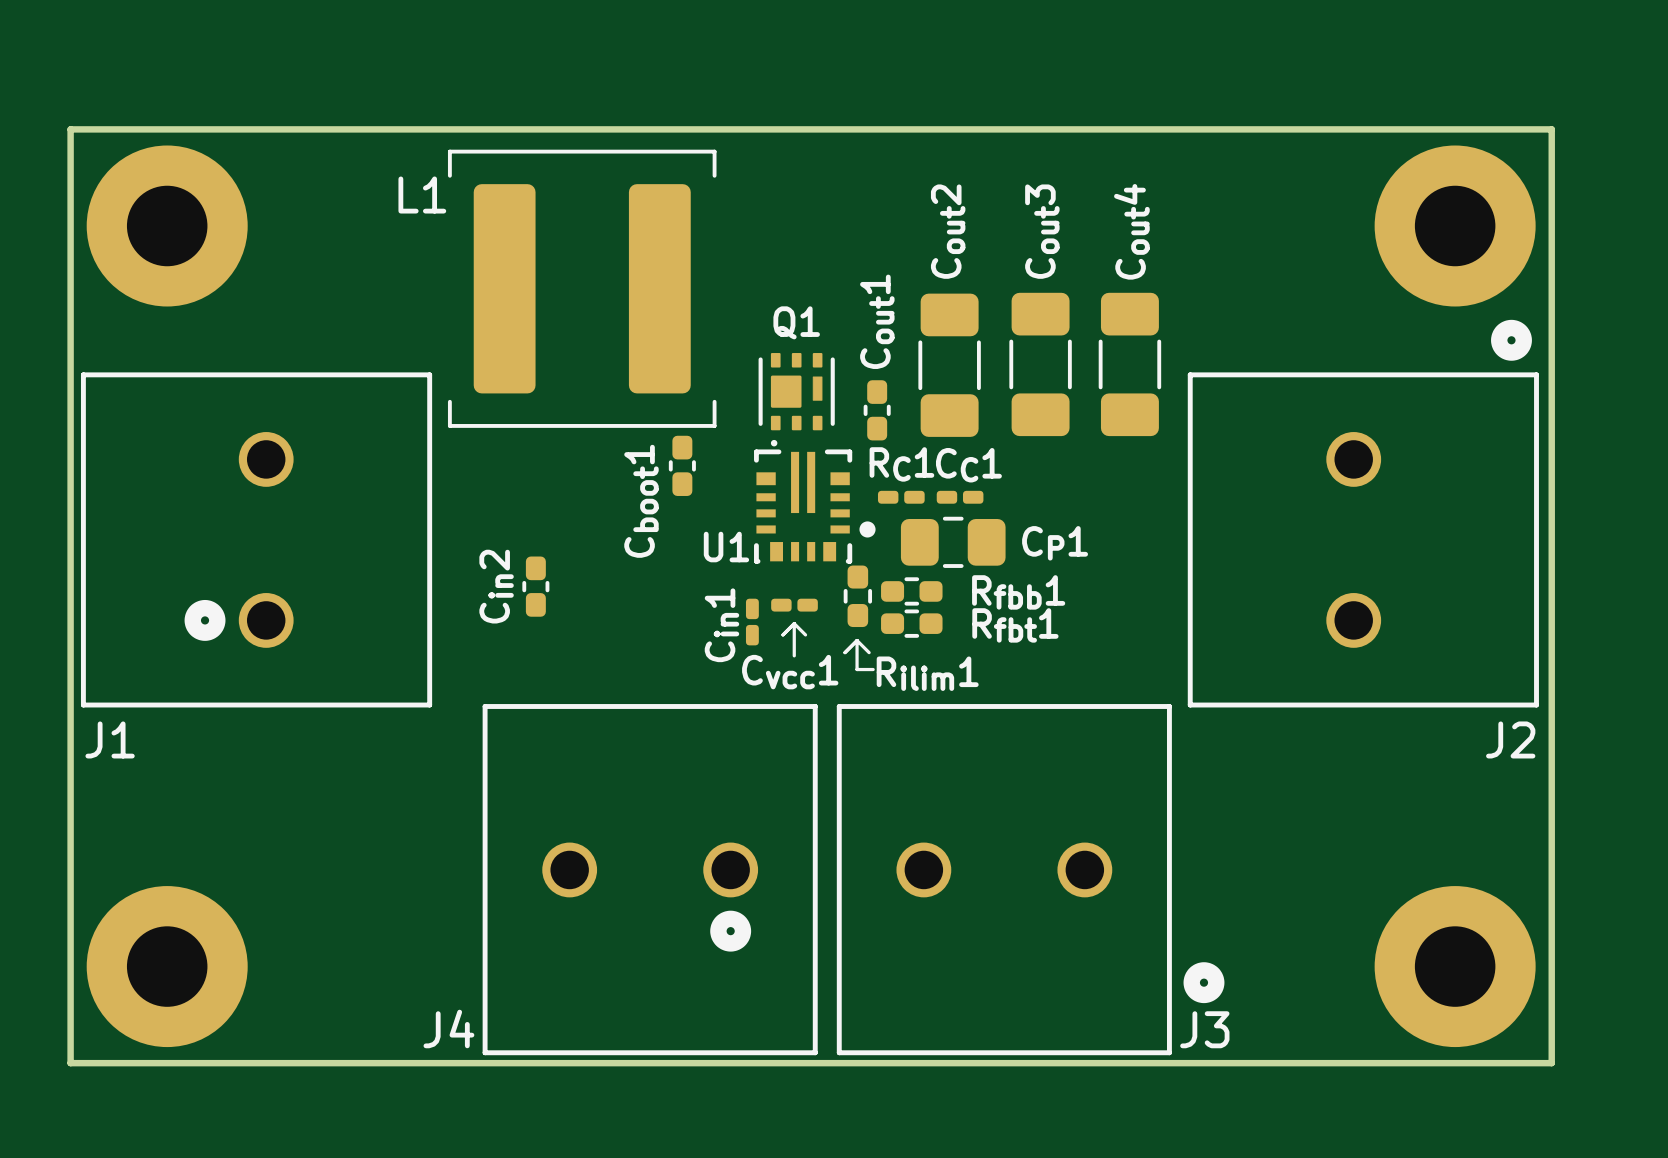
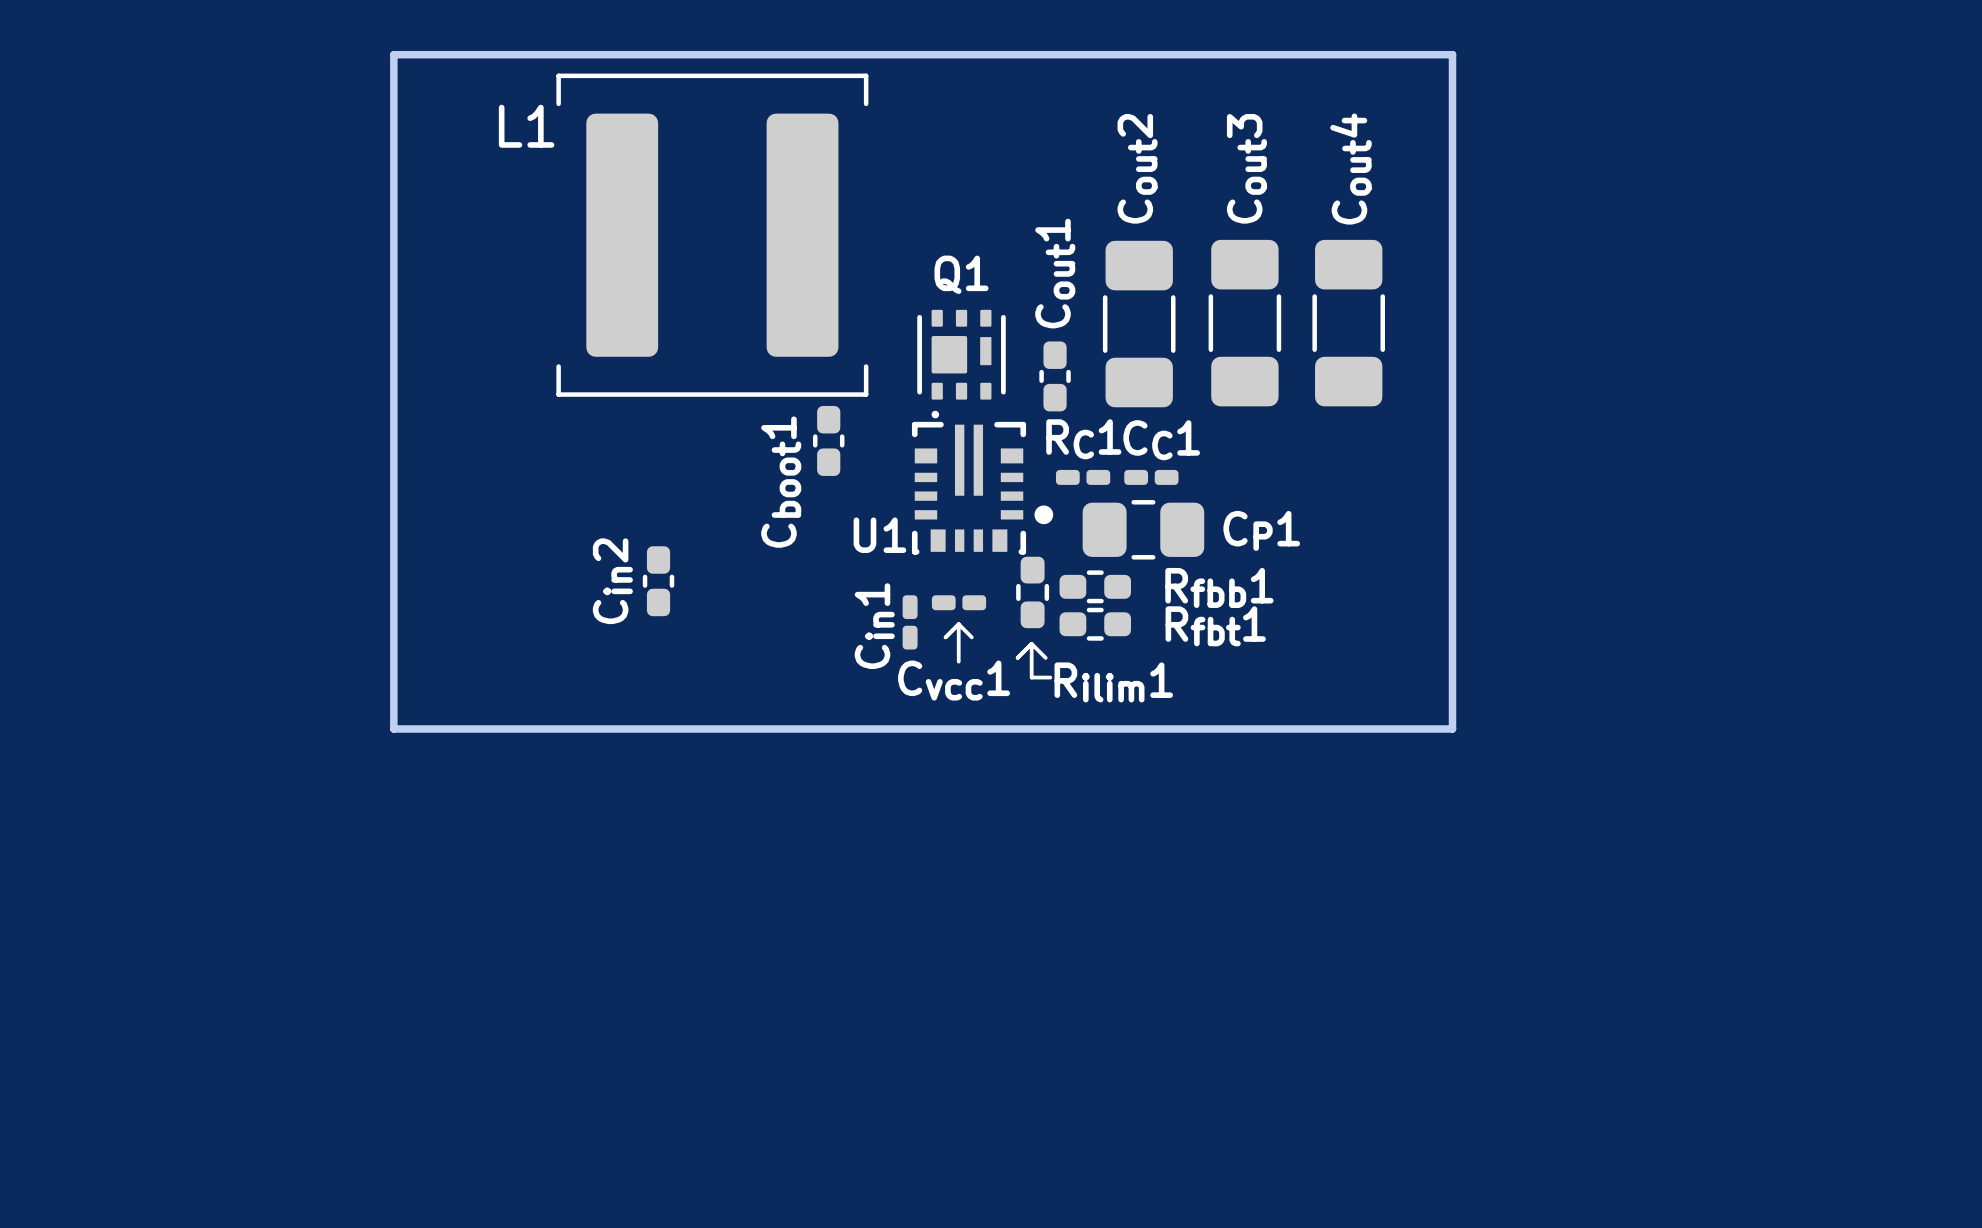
board edge: (70, 129) (1551, 129) (1551, 1063) (70, 1063) (70, 129) -> none
board edge: none -> (393, 54) (1452, 54) (1452, 728) (393, 728) (393, 54)
part: (167, 225) -> none
part: (1455, 225) -> none
J2: (1363, 513) -> none
J1: (256, 539) -> none
J4: (650, 879) -> none
J3: (1030, 879) -> none
part: (167, 966) -> none
part: (1455, 966) -> none

